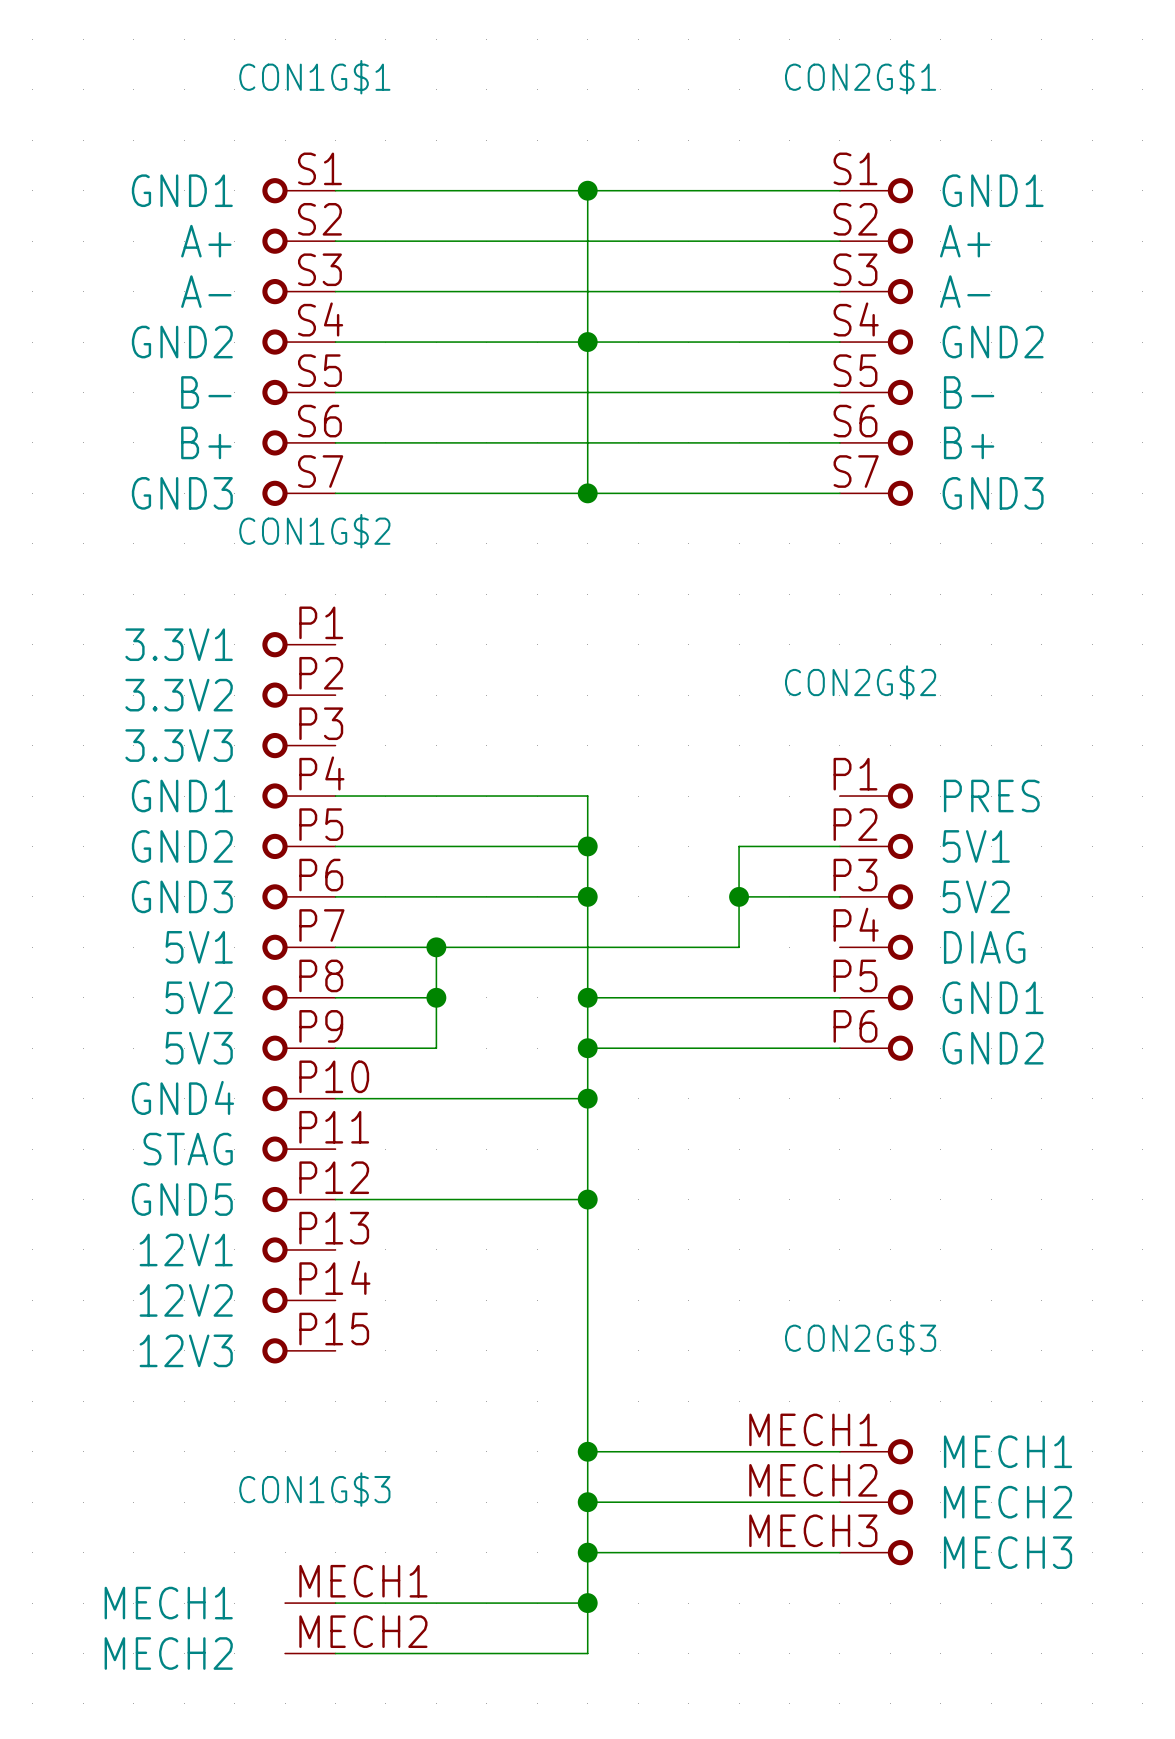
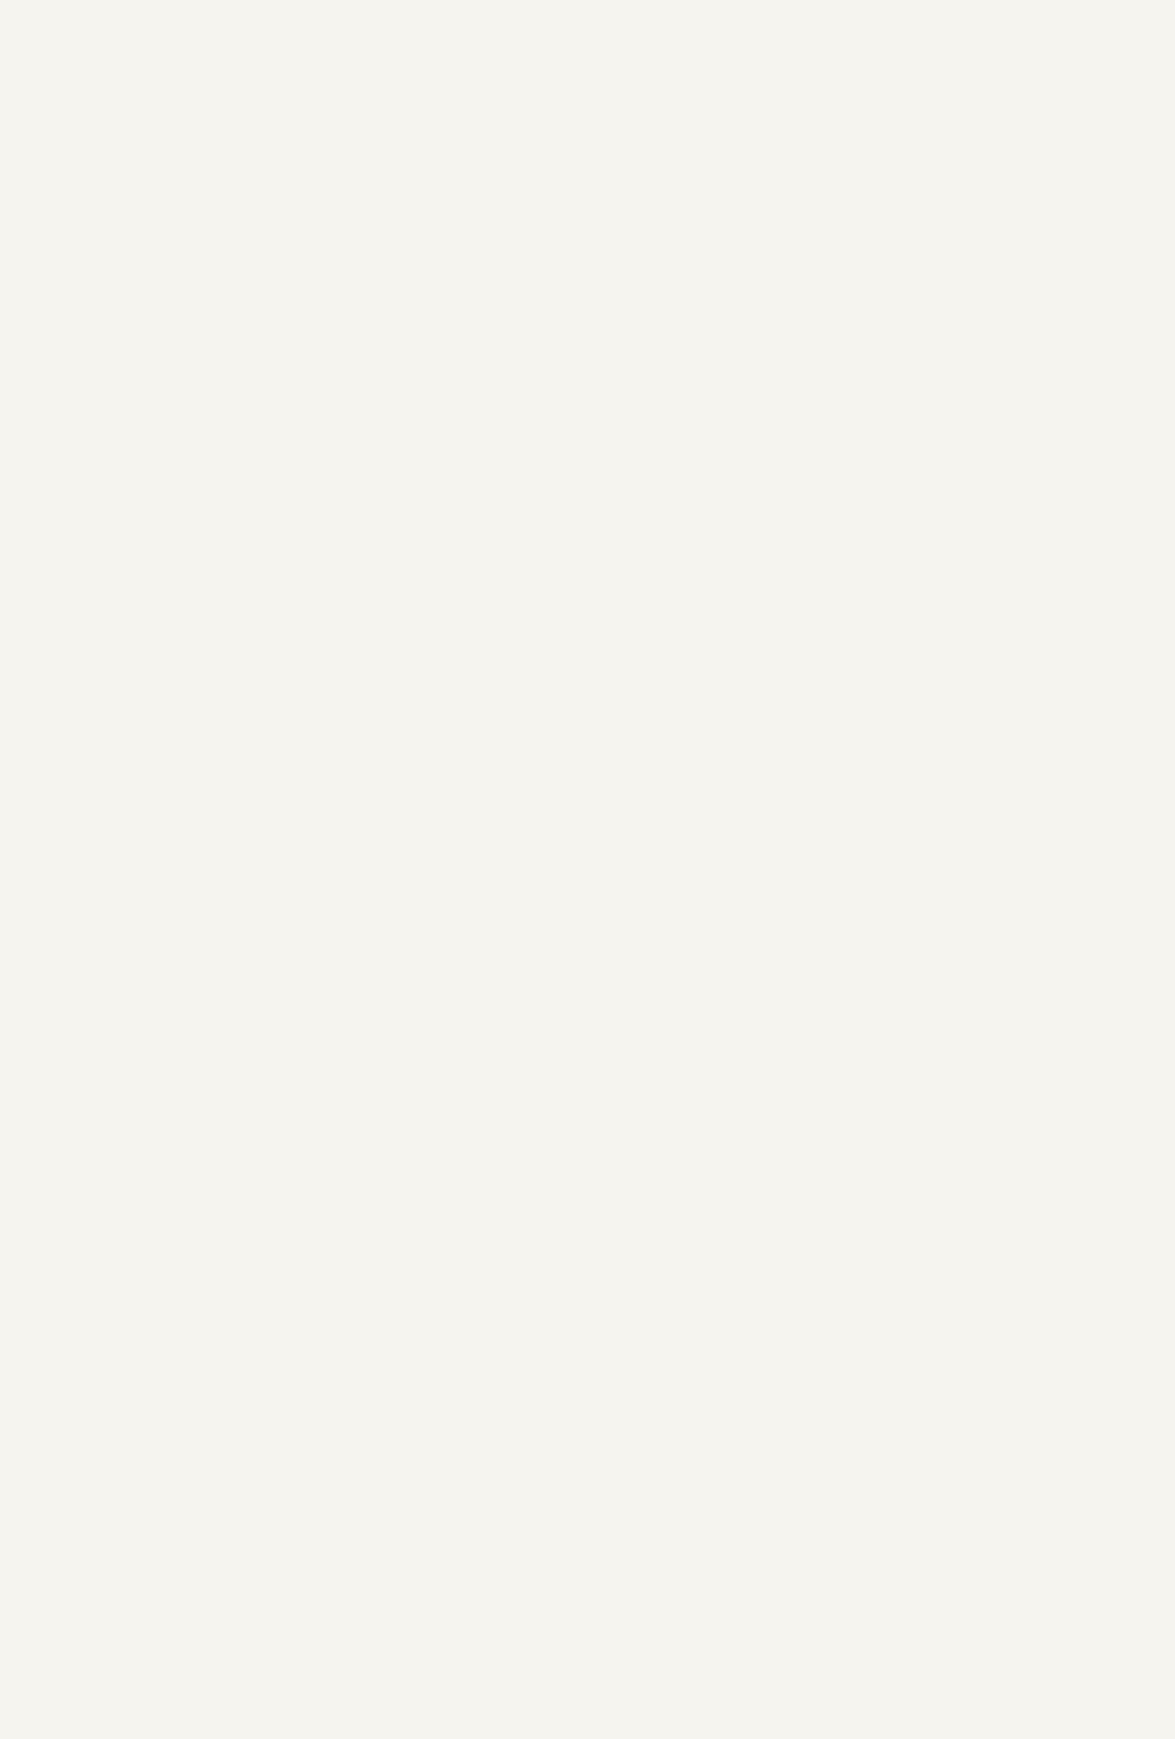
wire: (335, 190) (839, 190) -> none
wire: (587, 190) (587, 493) -> none
junction: (587, 190) -> none
wire: (335, 241) (839, 241) -> none
wire: (335, 291) (839, 291) -> none
CON1G$1: (298, 342) -> none
wire: (335, 342) (839, 342) -> none
junction: (587, 342) -> none
CON2G$1: (876, 342) -> none
wire: (335, 392) (839, 392) -> none
wire: (335, 442) (839, 442) -> none
wire: (335, 493) (839, 493) -> none
junction: (587, 493) -> none
wire: (335, 796) (587, 796) (587, 1653) (335, 1653) -> none
wire: (335, 846) (587, 846) -> none
junction: (587, 846) -> none
wire: (839, 846) (739, 846) (739, 947) (335, 947) -> none
wire: (335, 896) (587, 896) -> none
junction: (587, 896) -> none
wire: (739, 896) (839, 896) -> none
junction: (739, 896) -> none
CON2G$2: (876, 922) -> none
wire: (436, 947) (436, 1048) (335, 1048) -> none
junction: (436, 947) -> none
CON1G$2: (298, 997) -> none
wire: (335, 997) (436, 997) -> none
junction: (436, 997) -> none
wire: (587, 997) (839, 997) -> none
junction: (587, 997) -> none
wire: (587, 1048) (839, 1048) -> none
junction: (587, 1048) -> none
wire: (335, 1098) (587, 1098) -> none
junction: (587, 1098) -> none
wire: (335, 1199) (587, 1199) -> none
junction: (587, 1199) -> none
wire: (587, 1451) (839, 1451) -> none
junction: (587, 1451) -> none
wire: (587, 1502) (839, 1502) -> none
junction: (587, 1502) -> none
CON2G$3: (876, 1502) -> none
wire: (587, 1552) (839, 1552) -> none
junction: (587, 1552) -> none
wire: (335, 1603) (587, 1603) -> none
junction: (587, 1603) -> none
CON1G$3: (310, 1628) -> none

